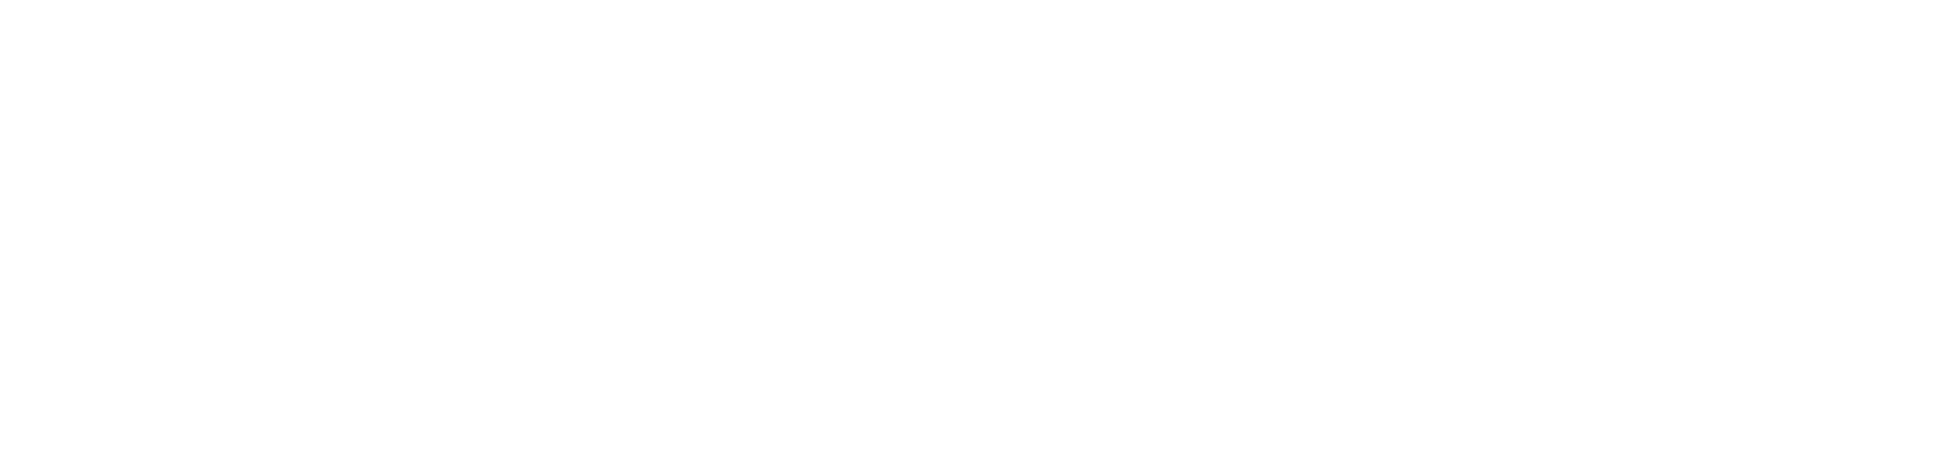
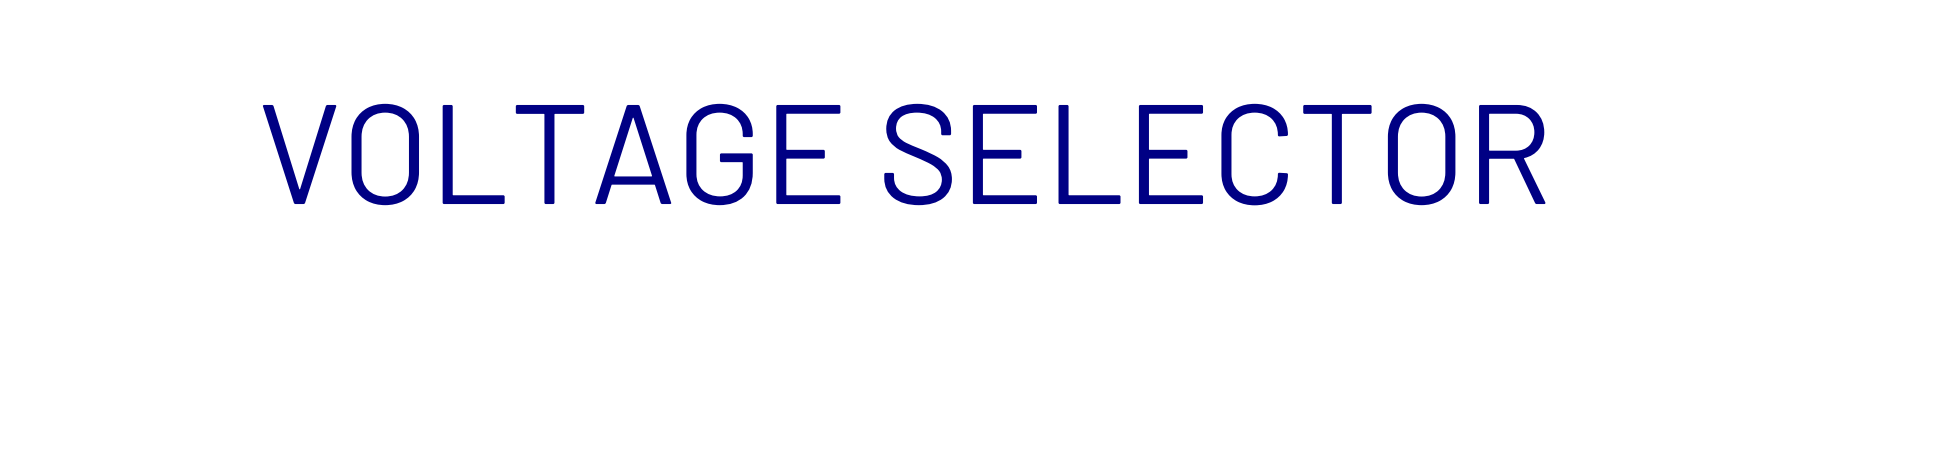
text: none -> VOLTAGE SELECTOR (904, 154)

